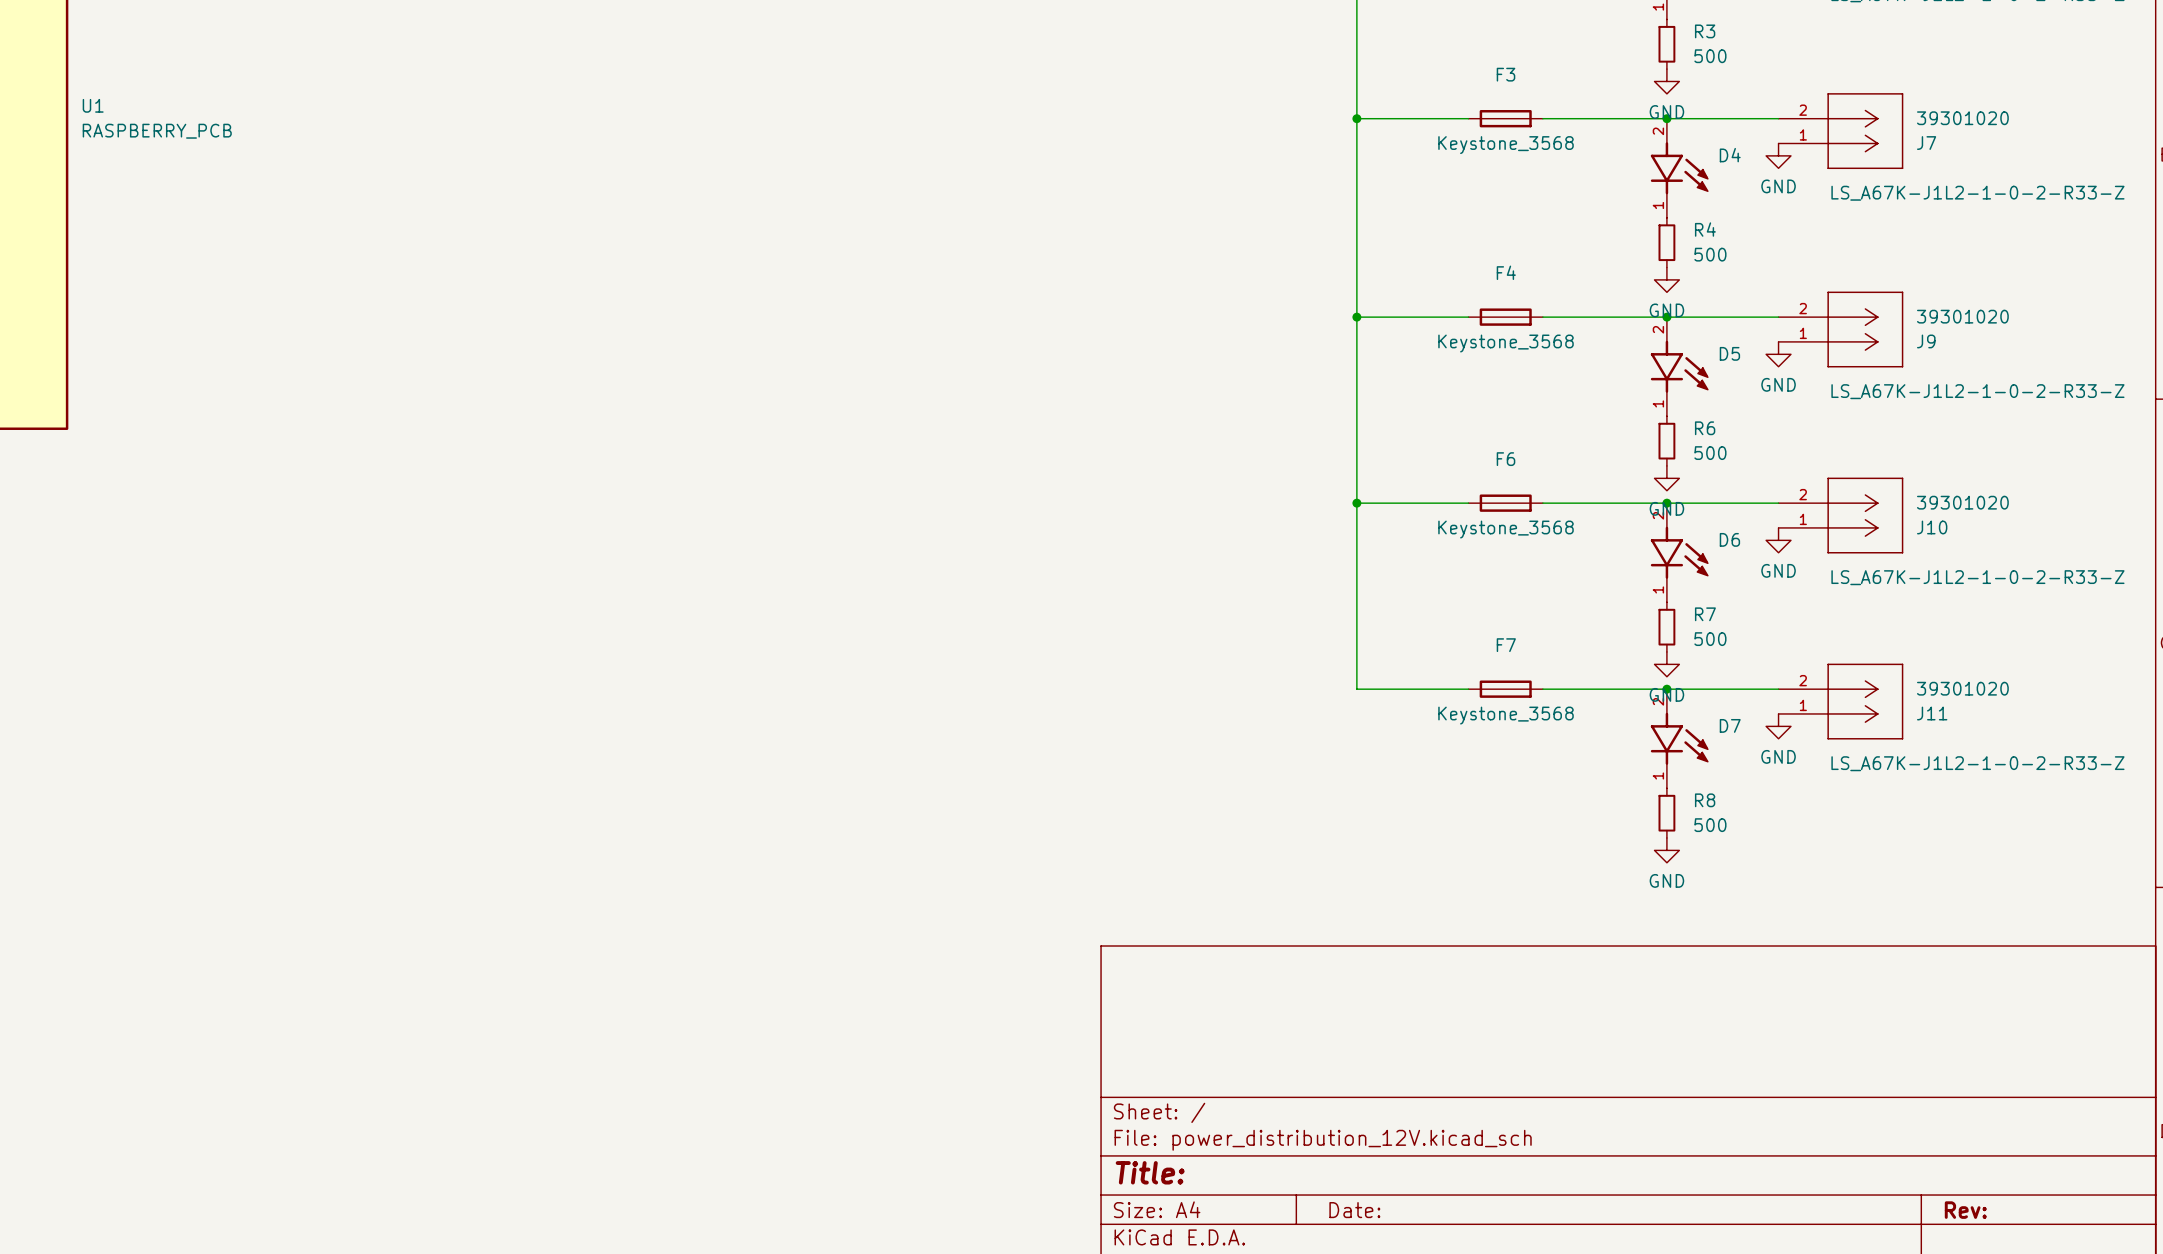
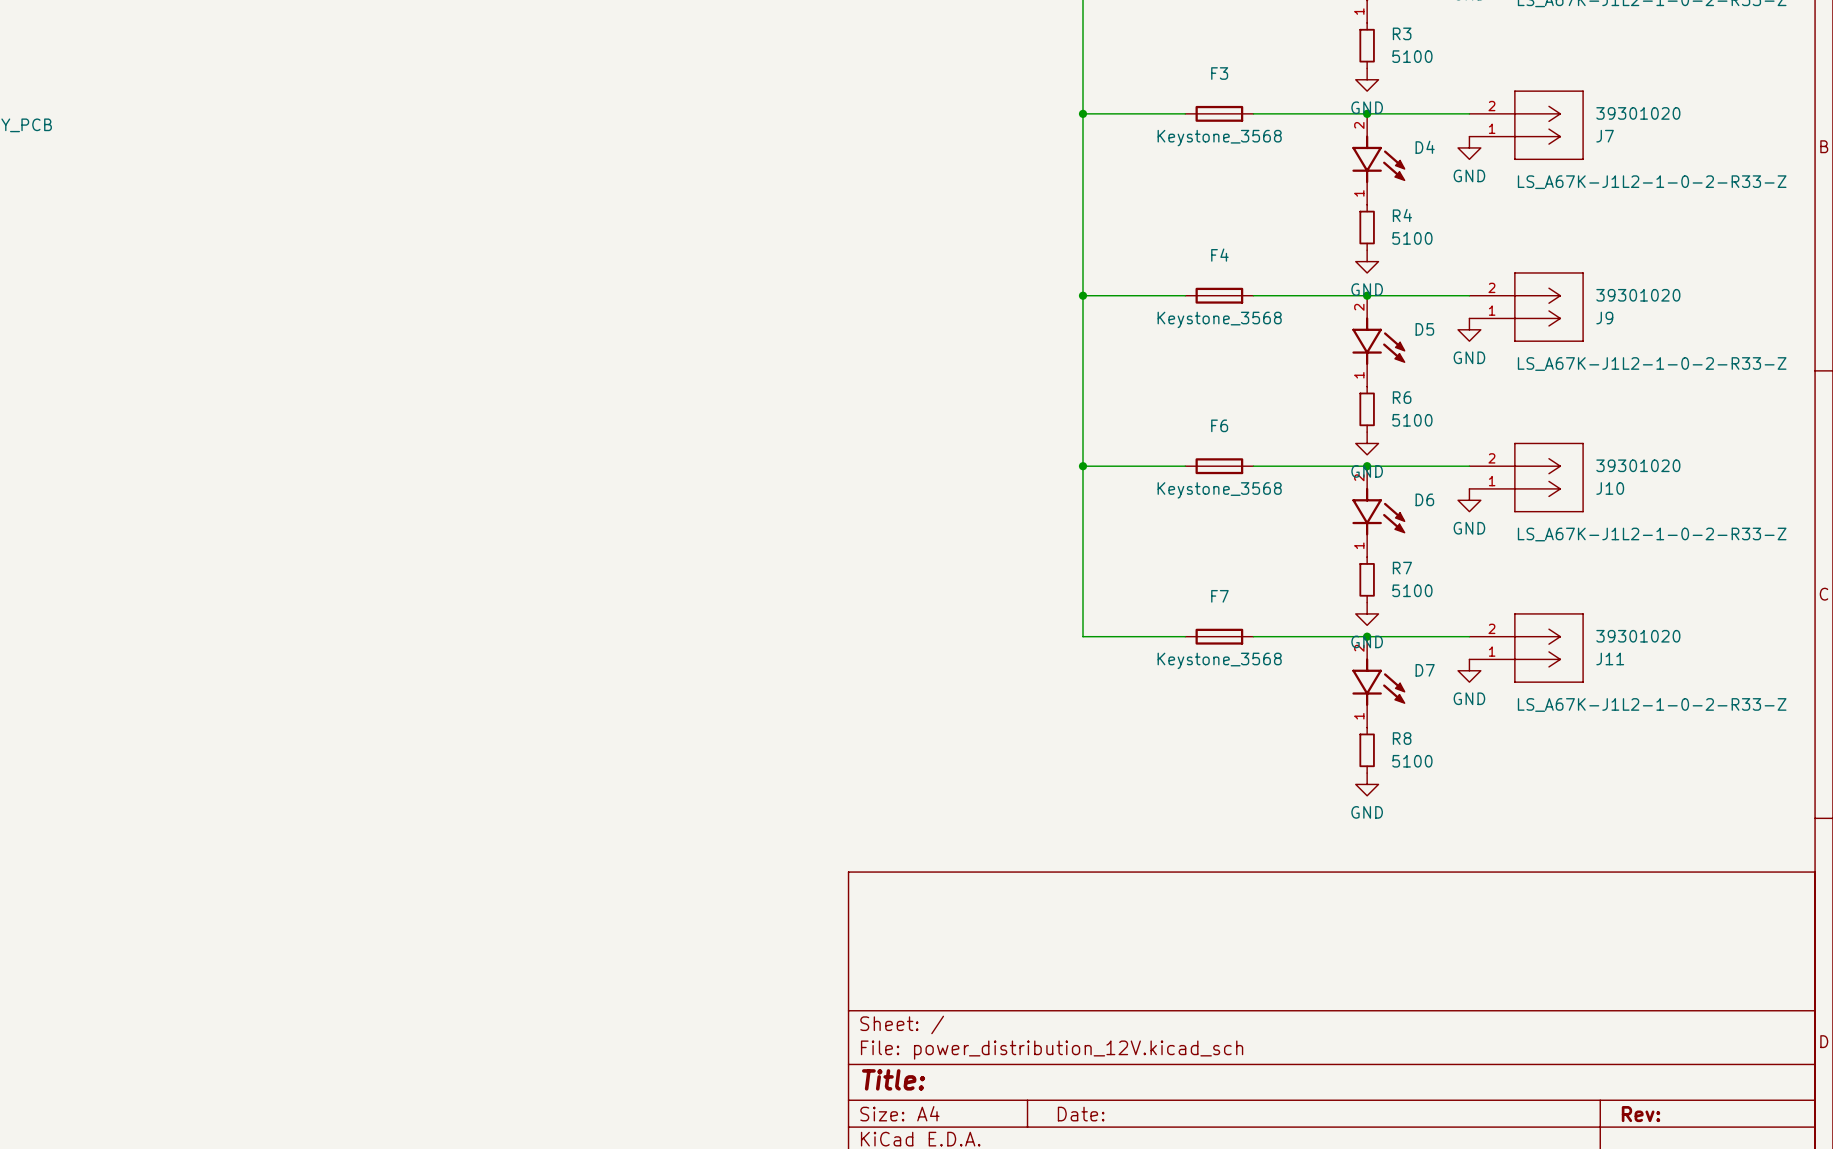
R3 value: 500 (1710, 56) -> 5100 (1412, 56)
R4 value: 500 (1710, 254) -> 5100 (1412, 238)
R6 value: 500 (1710, 453) -> 5100 (1412, 420)
R7 value: 500 (1710, 639) -> 5100 (1412, 590)
R8 value: 500 (1710, 825) -> 5100 (1412, 761)

